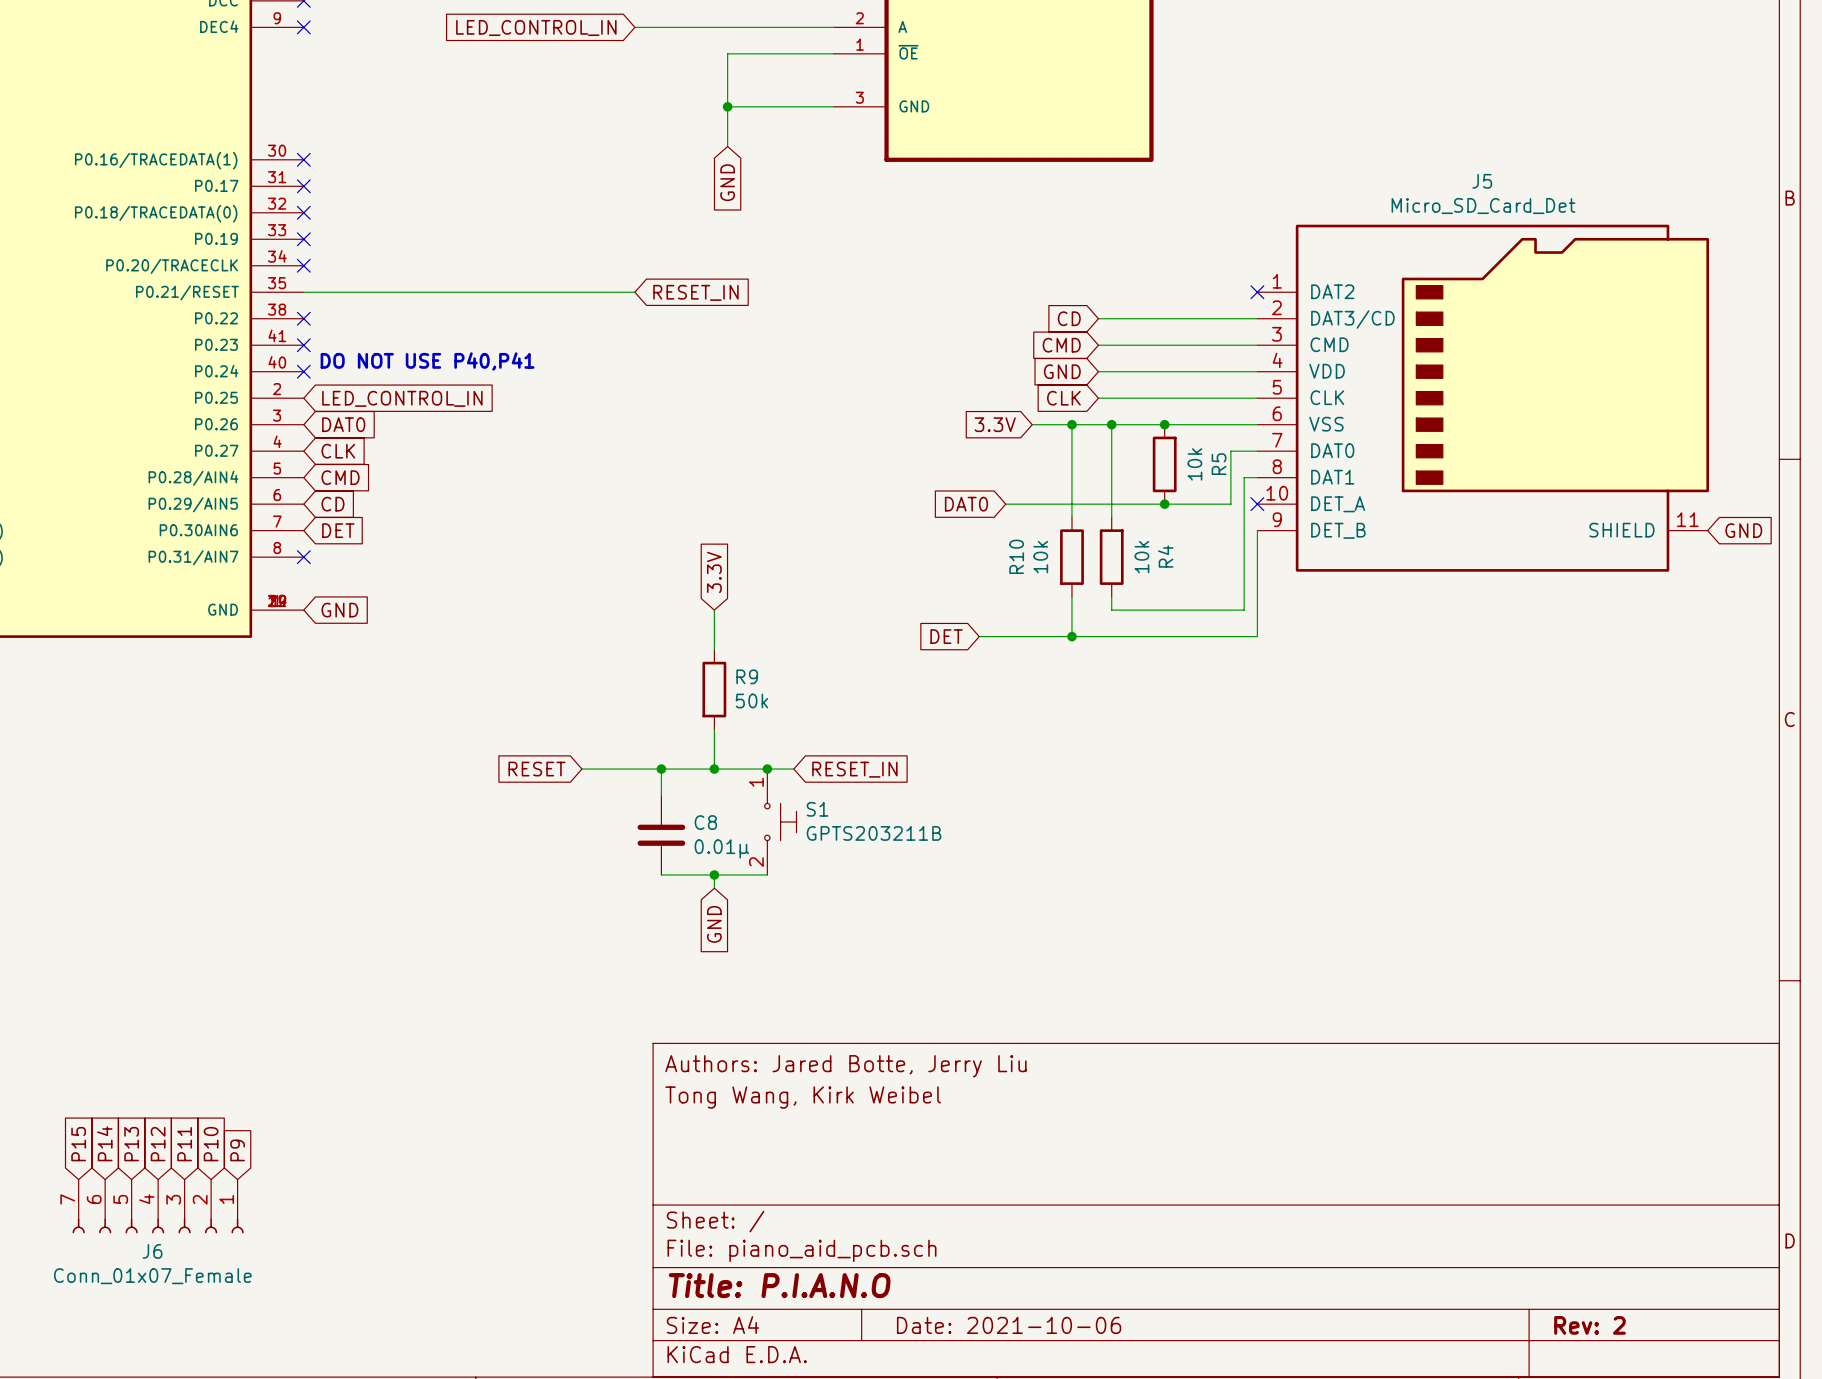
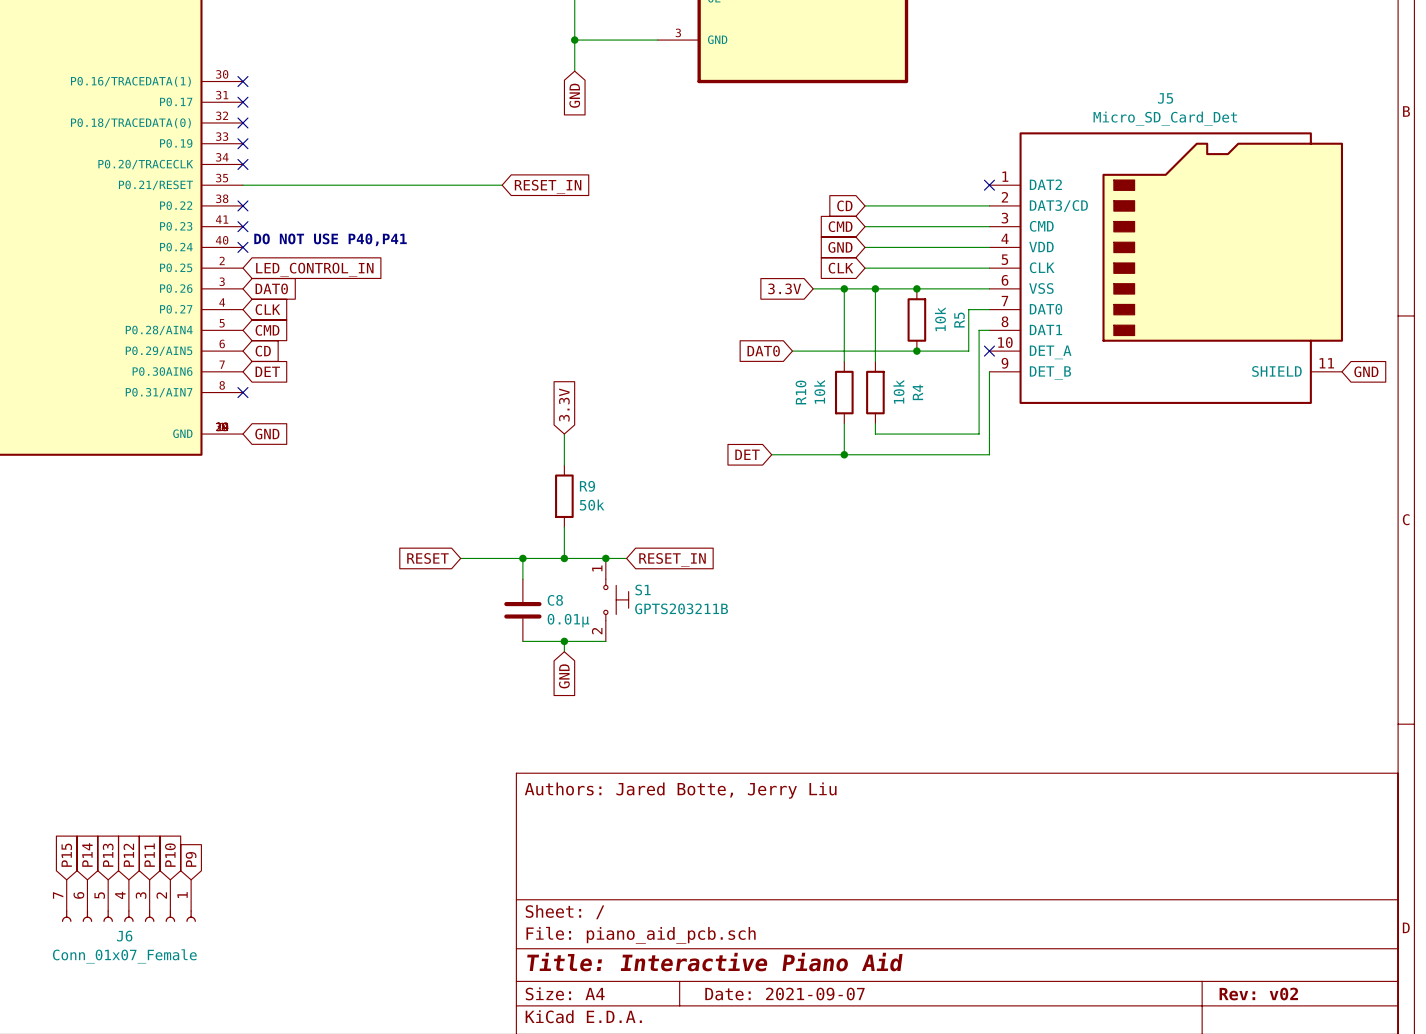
title block: Tong Wang, Kirk Weibel (803, 1097) -> none
title block: Title: P.I.A.N.O (779, 1285) -> Title: Interactive Piano Aid (714, 962)
title block: Date: 2021-10-06 (1009, 1325) -> Date: 2021-09-07 (784, 994)
title block: Rev: 2 (1589, 1325) -> Rev: v02 (1258, 994)

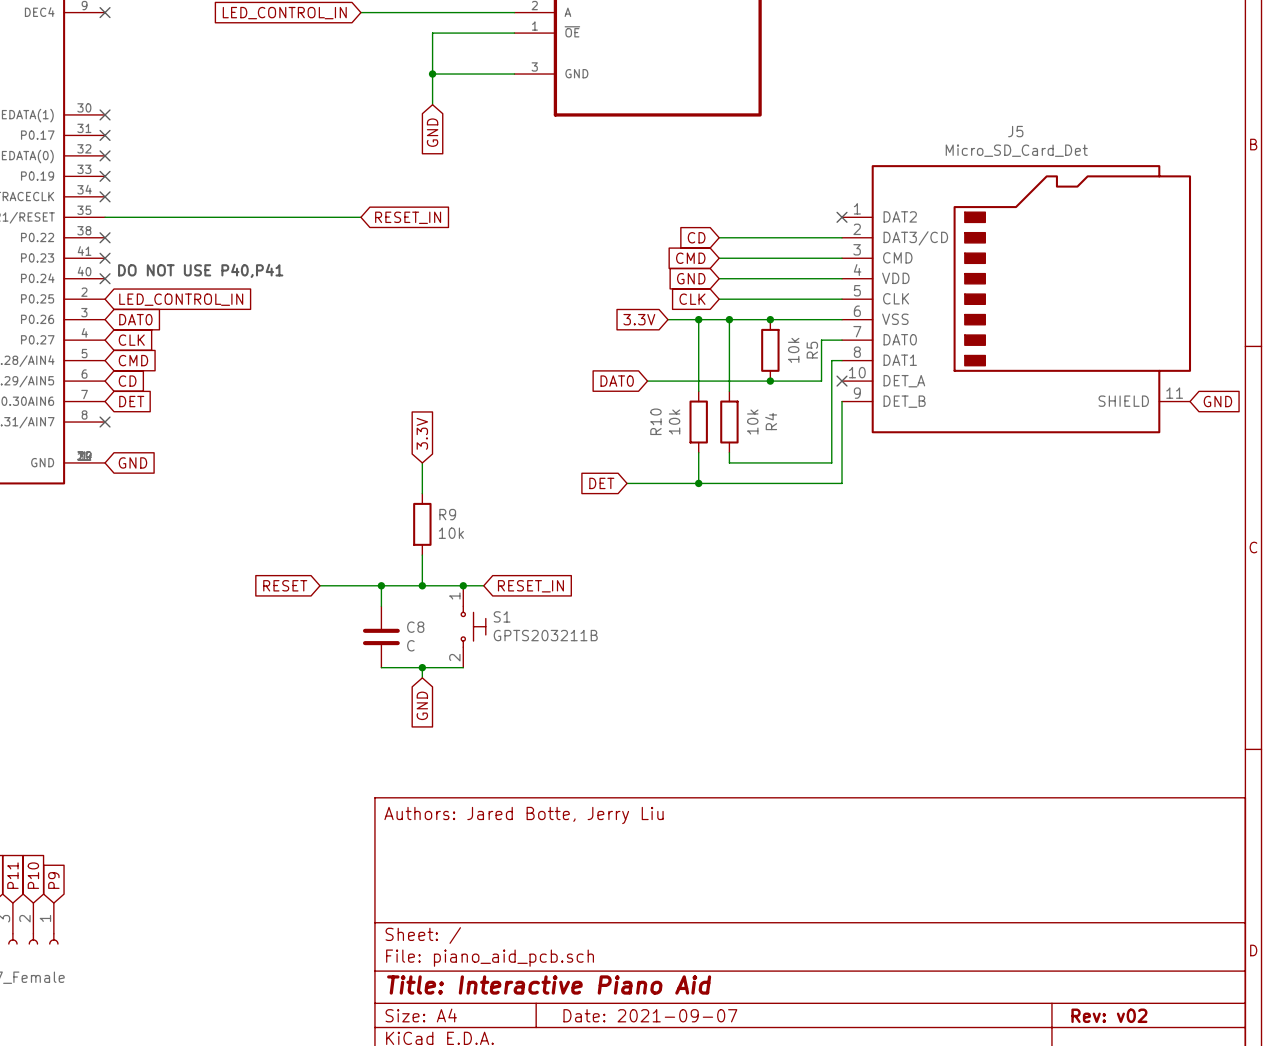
R9 value: 50k (592, 505) -> 10k (451, 533)
C8 value: 0.01µ (568, 620) -> C (410, 645)

